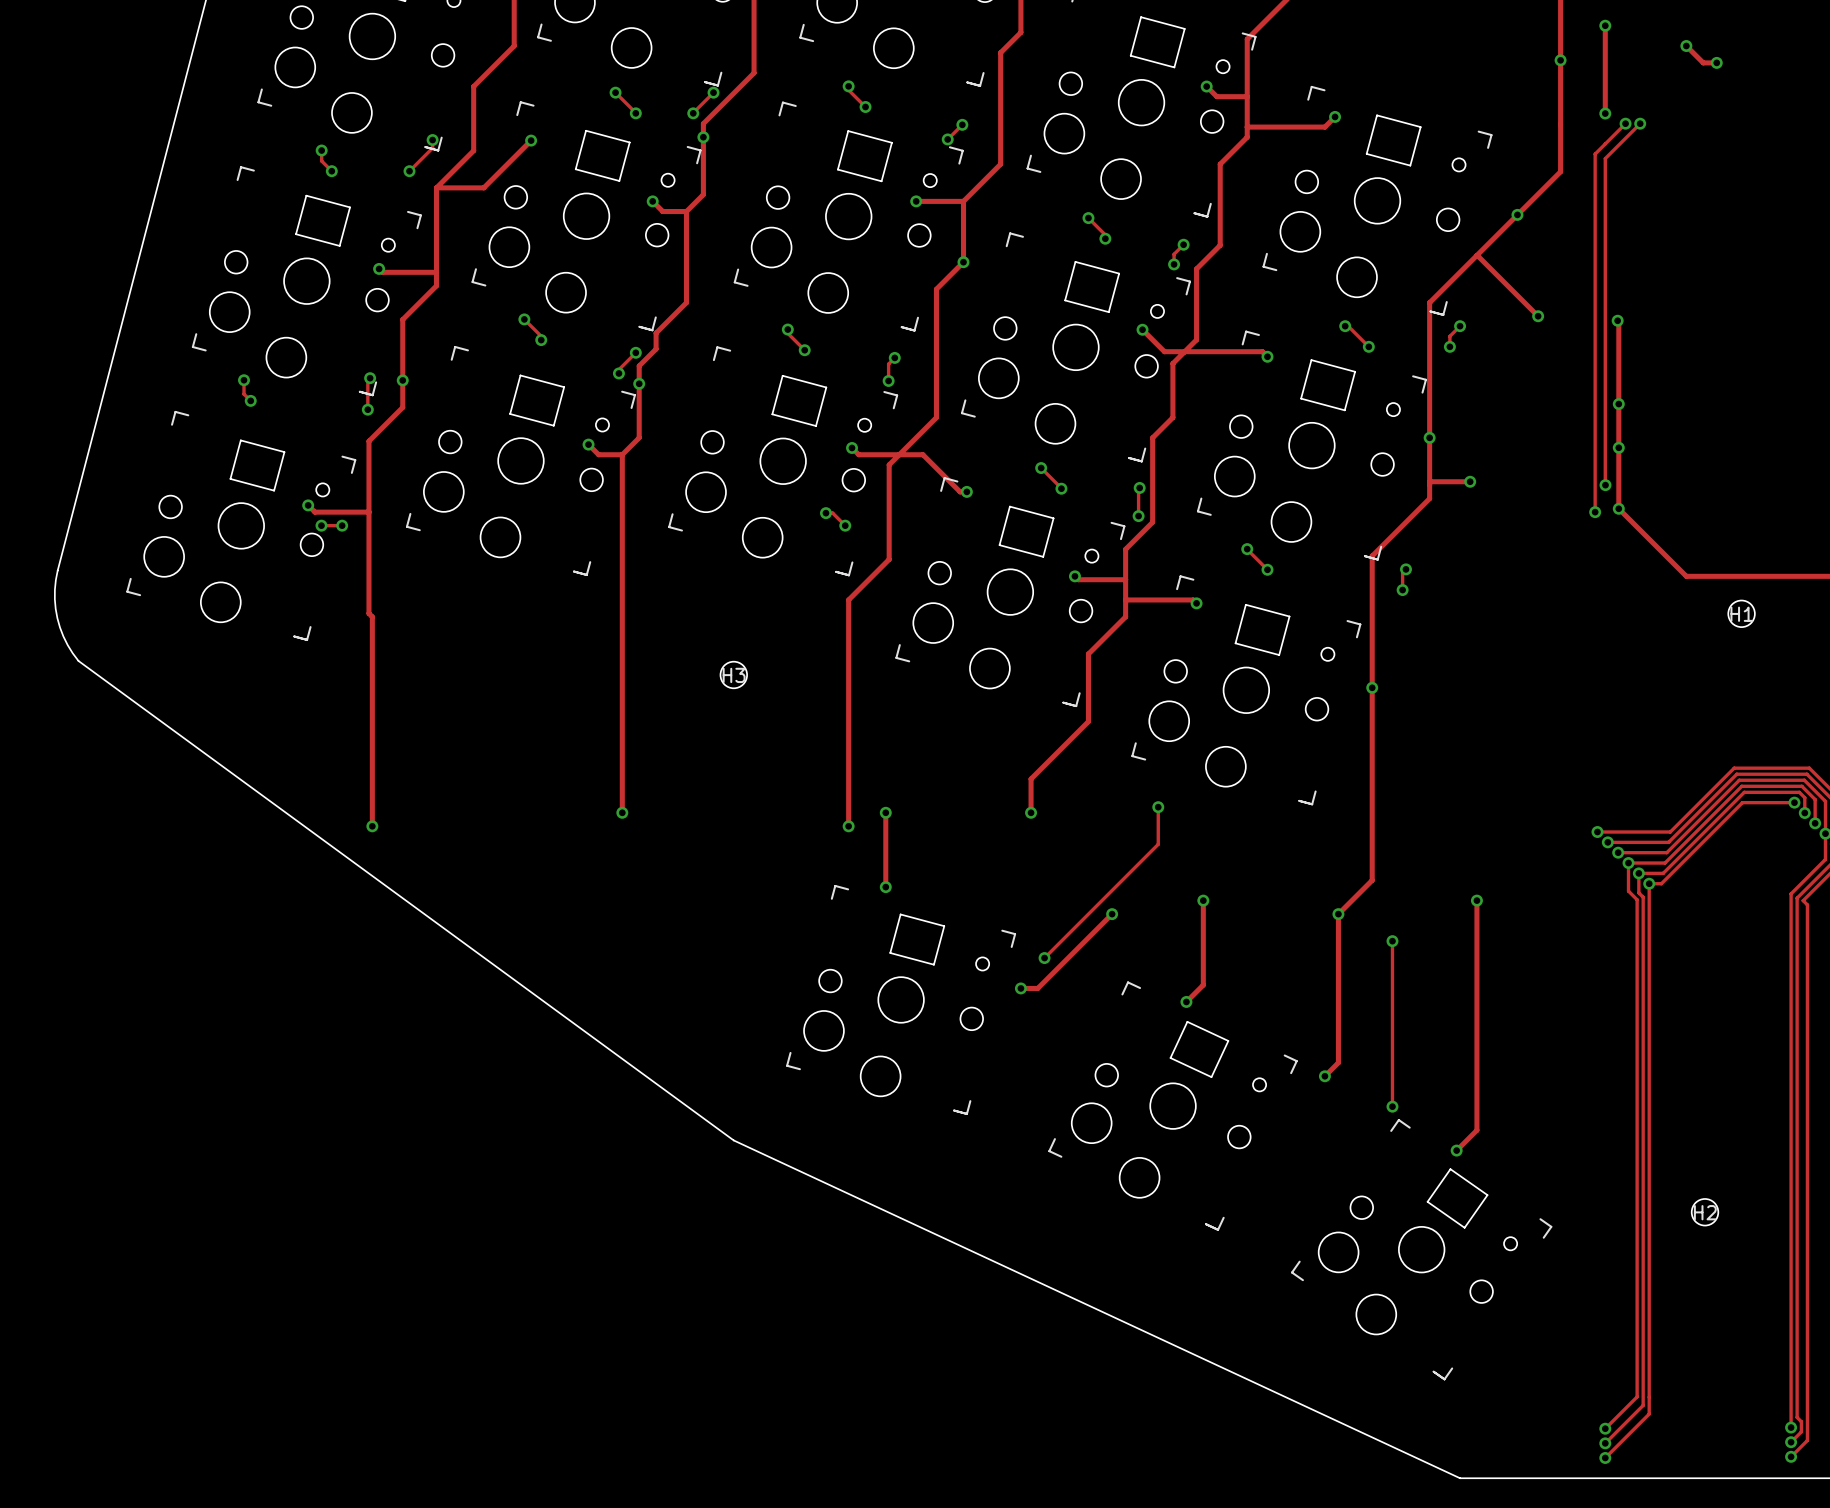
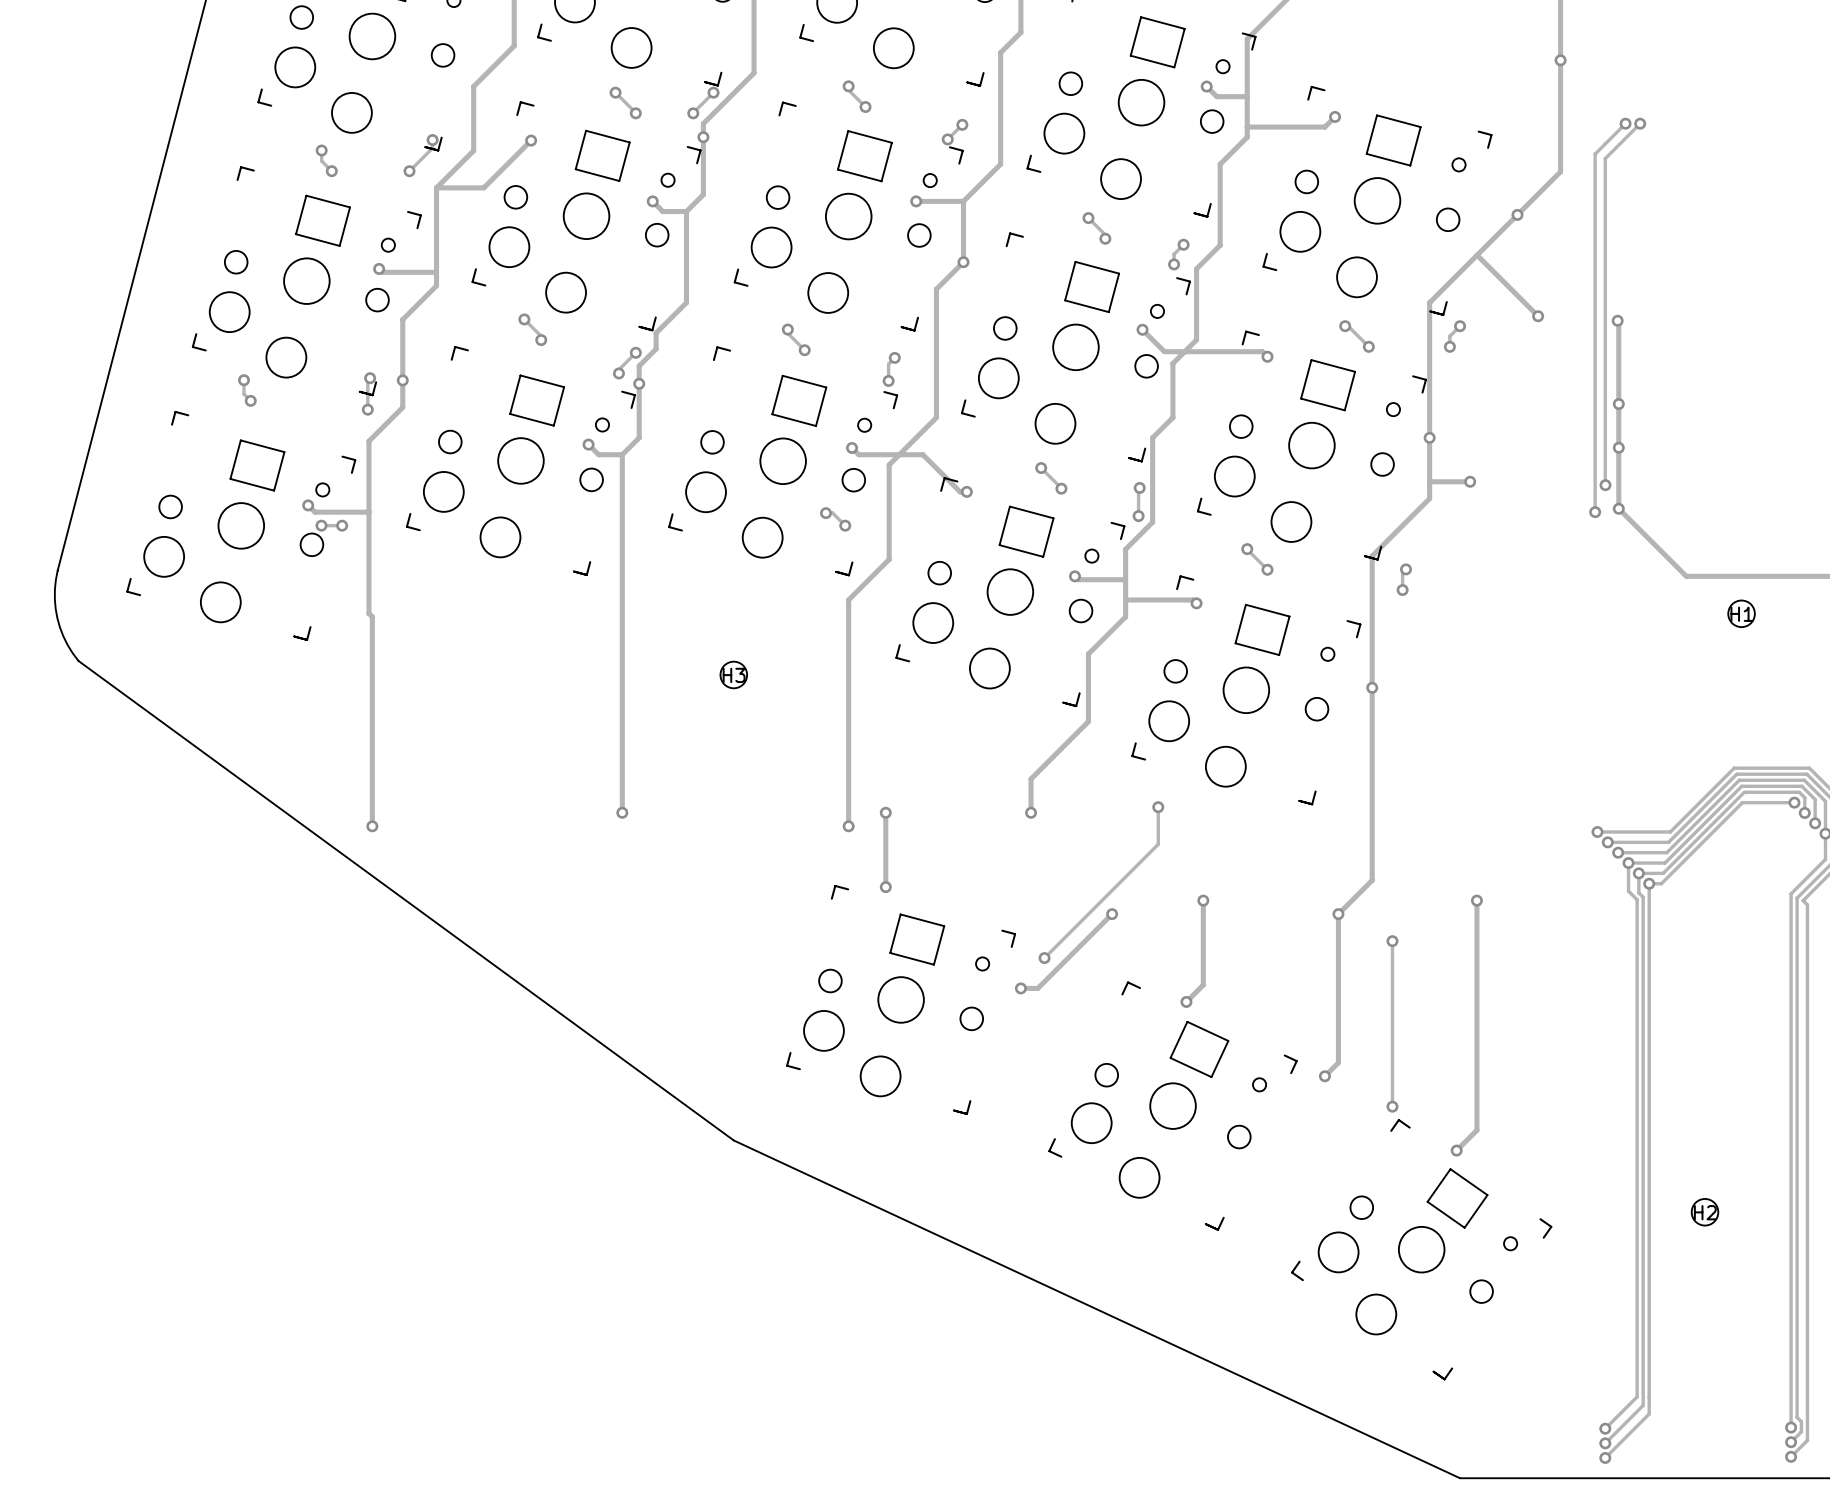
track: (1605, 25) (1605, 113) -> none
via: (1605, 25) -> none
track: (1686, 46) (1703, 62) (1716, 62) -> none
via: (1686, 46) -> none
via: (1716, 62) -> none
via: (1605, 113) -> none

